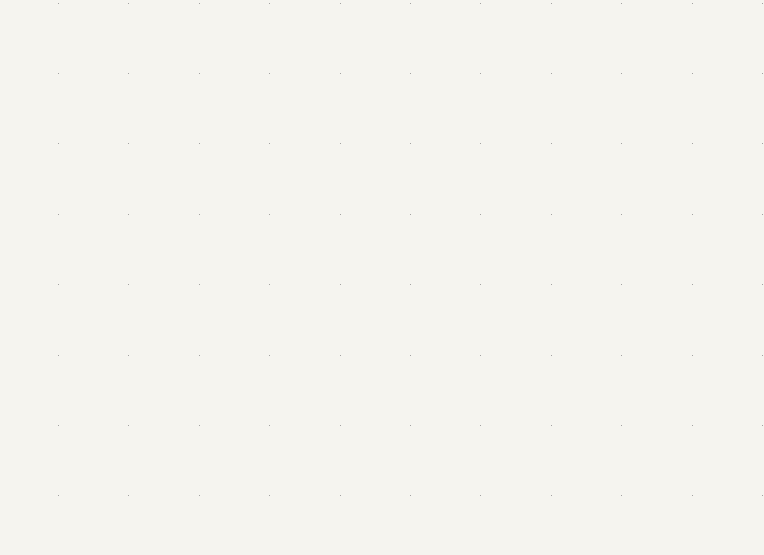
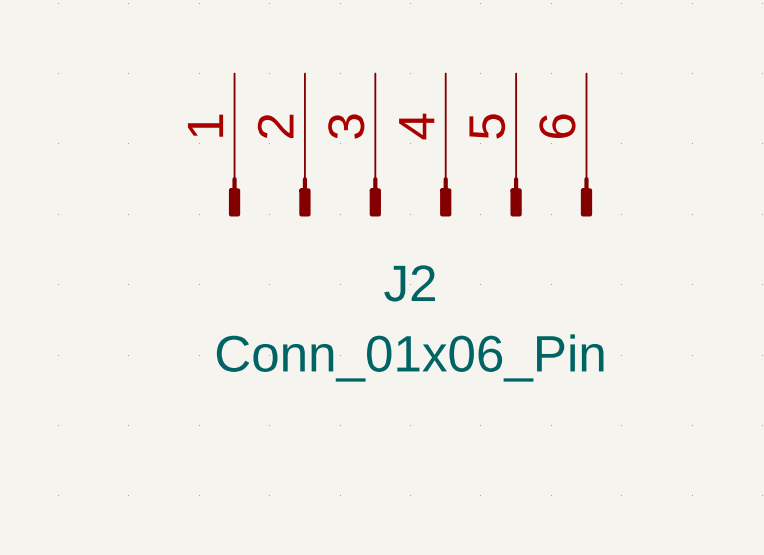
J2: none -> Conn_01x06_Pin (410, 145)

